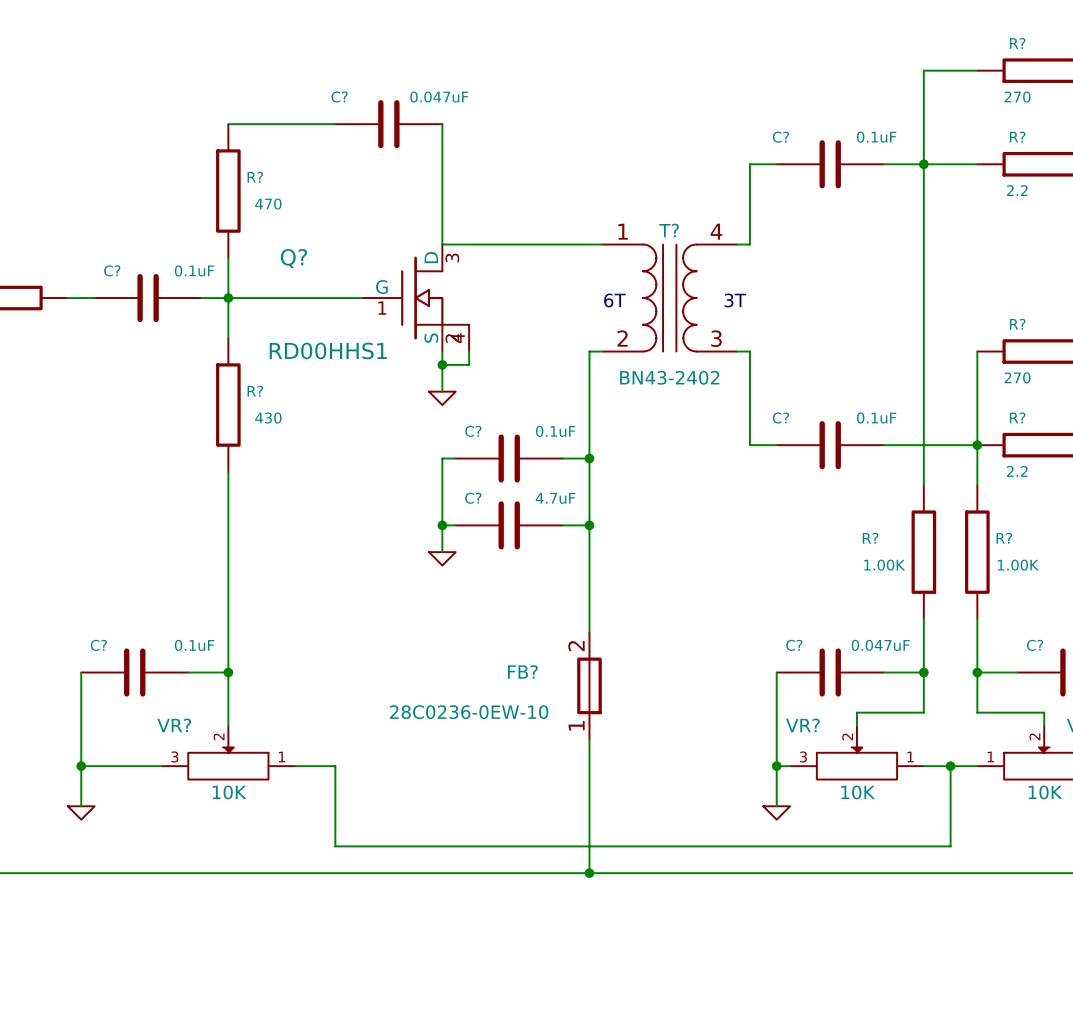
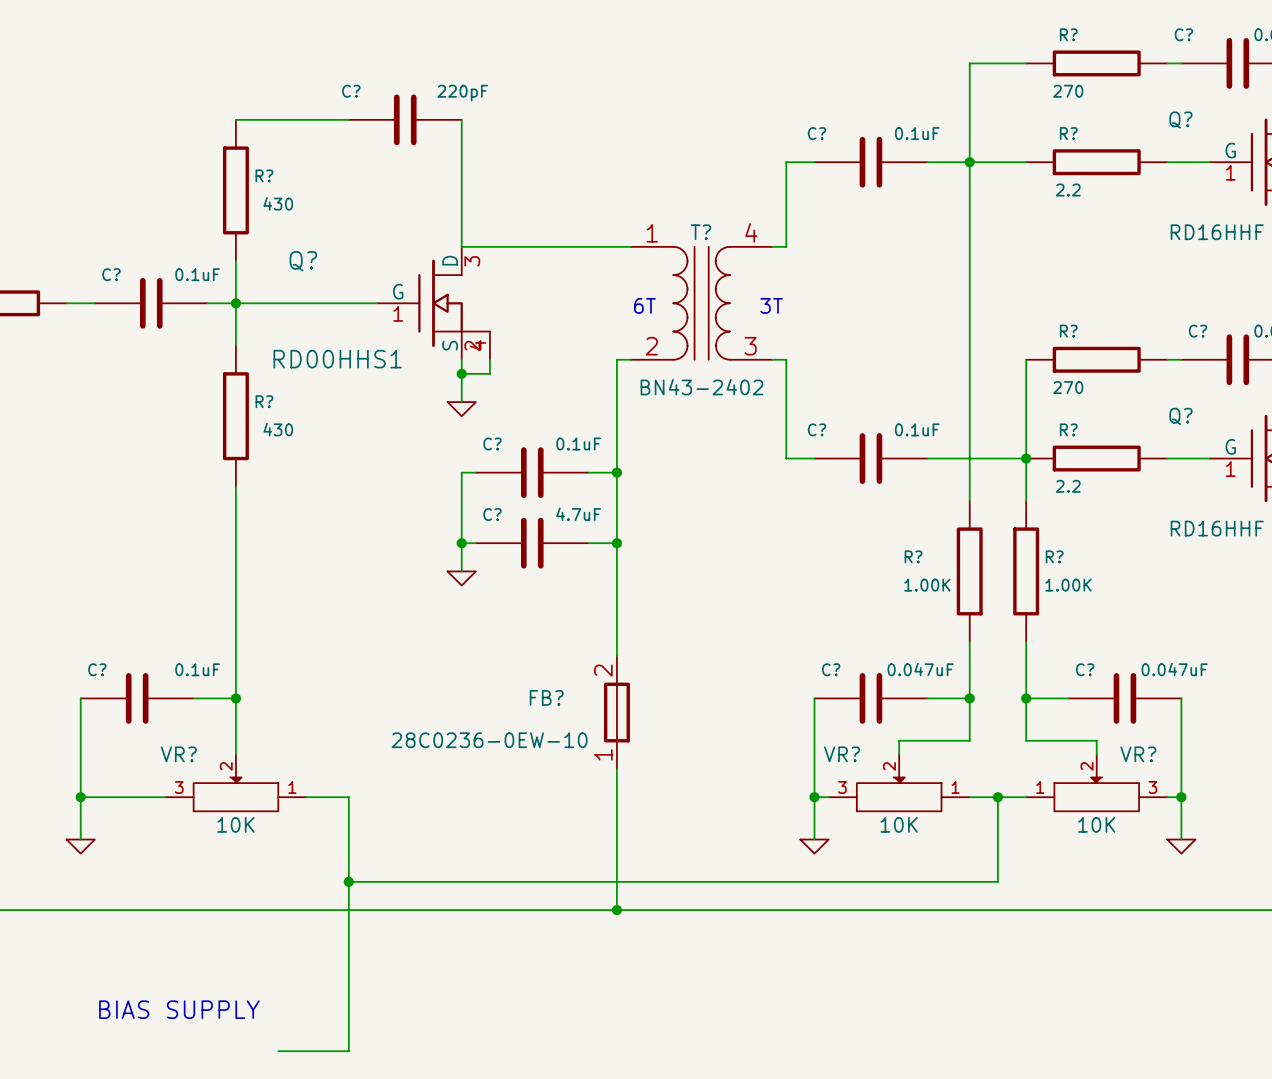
C? value: 0.047uF (439, 97) -> 220pF (462, 93)
R? value: 470 (268, 204) -> 430 (278, 203)
wire: none -> (348, 881) (348, 1051) (278, 1051)
junction: none -> (348, 881)
text: none -> BIAS SUPPLY (179, 1009)

